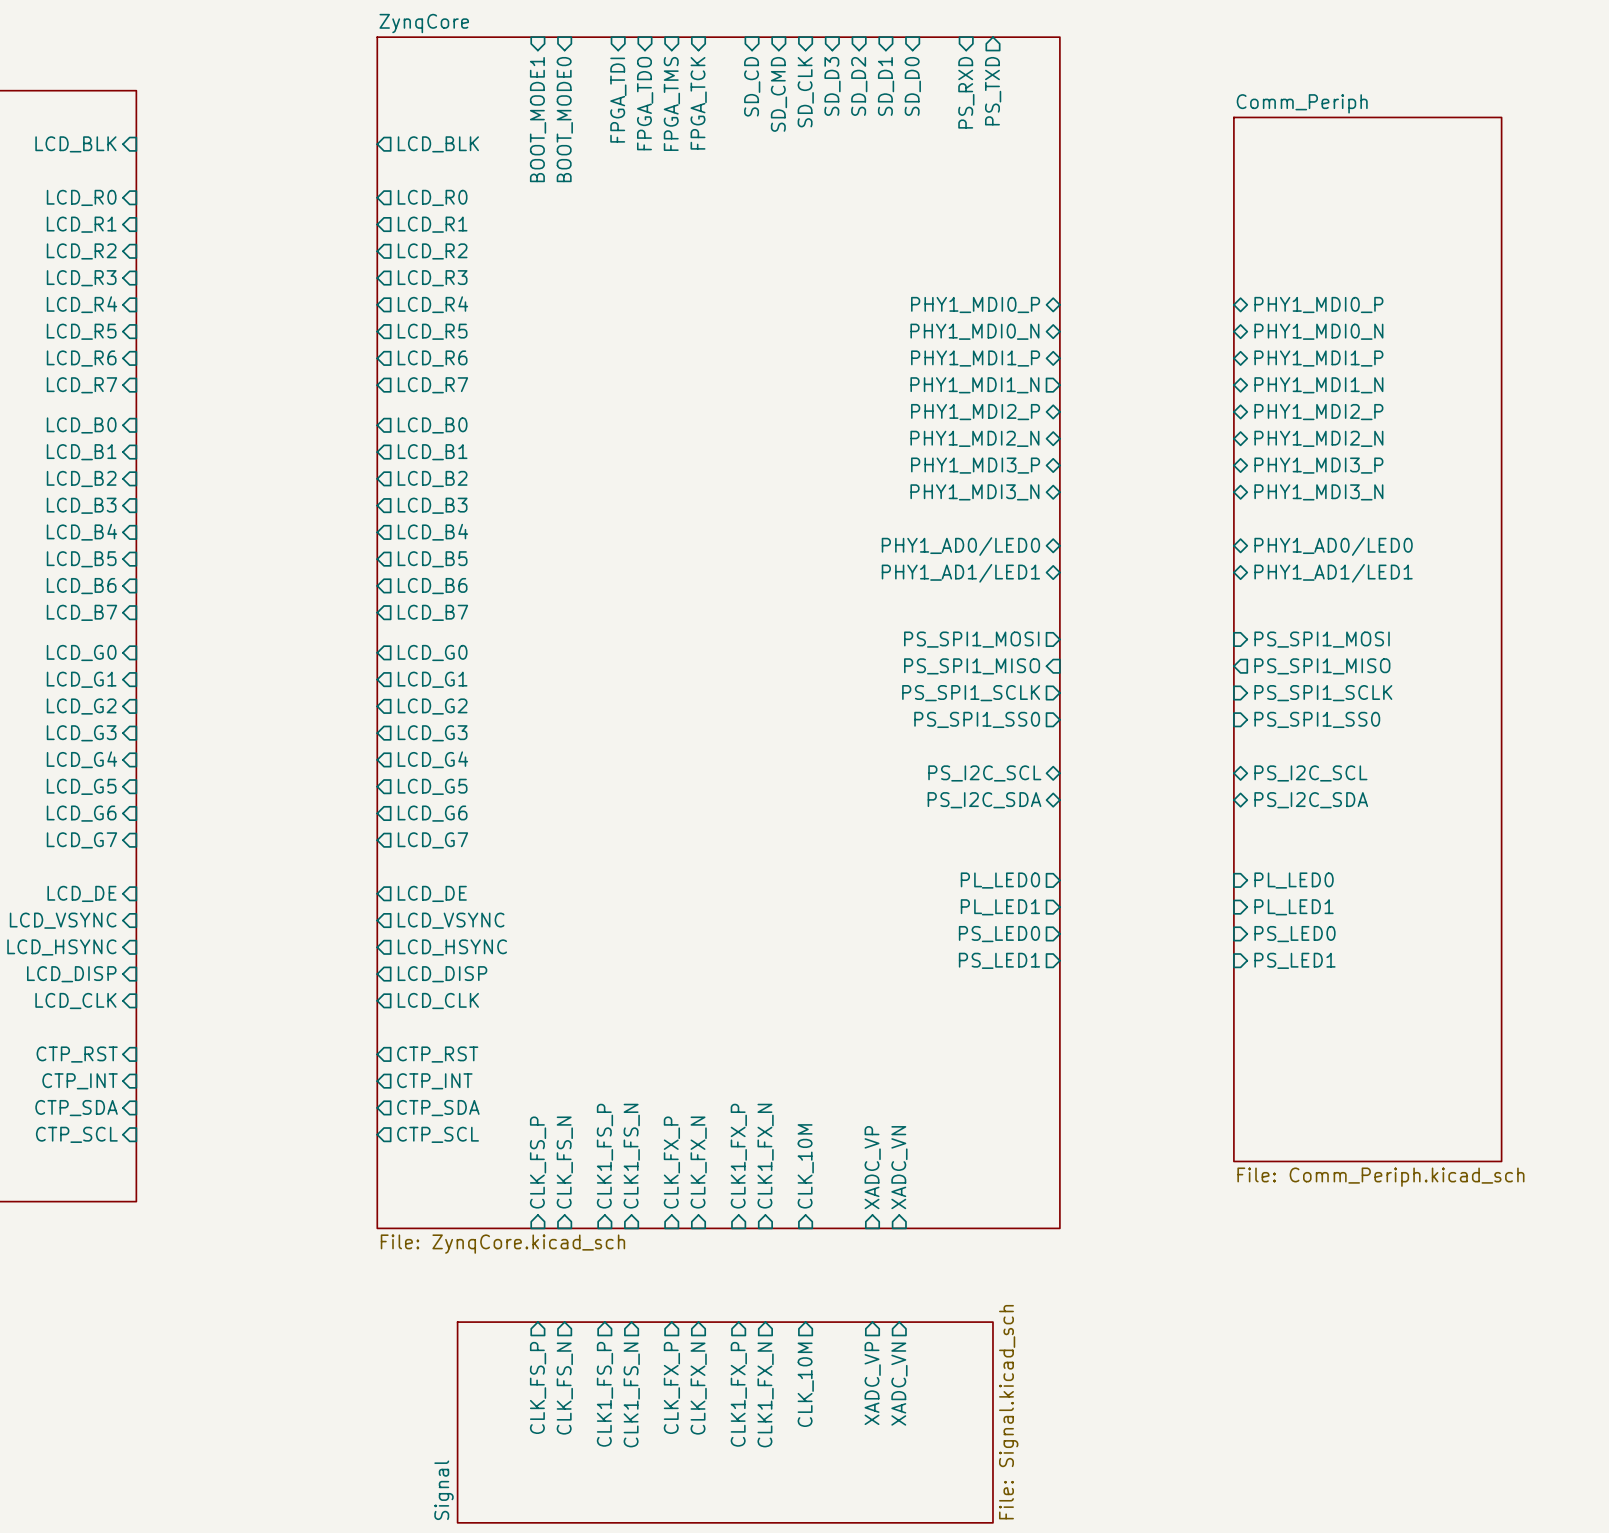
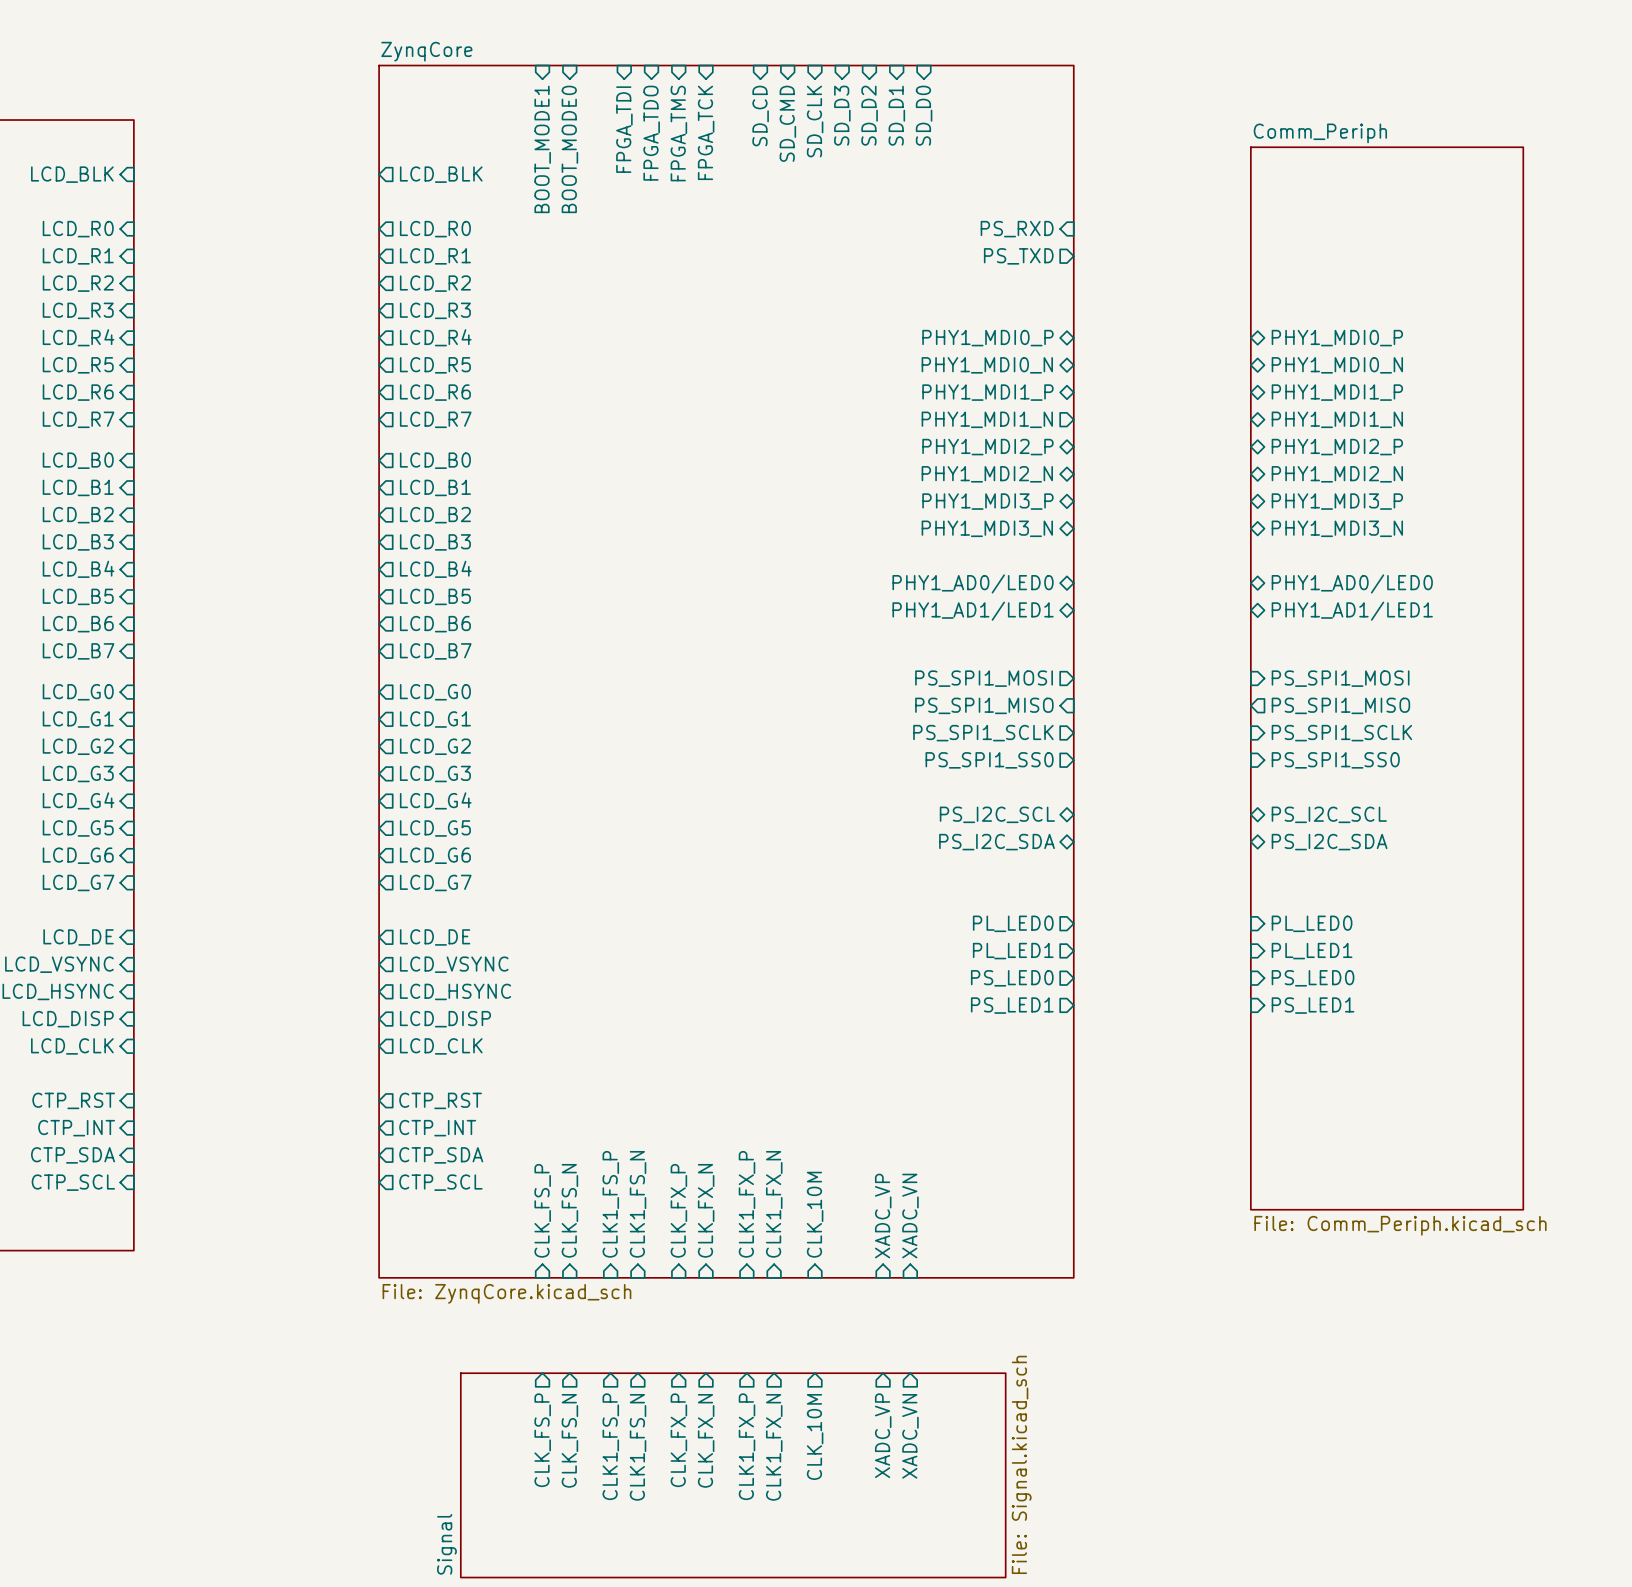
sheet pin rotation: 0° (993, 91) -> 90° clockwise (1018, 256)
sheet pin position: PS_TXD (993, 91) -> PS_TXD (1018, 256)
sheet pin rotation: 0° (966, 92) -> 90° clockwise (1017, 229)
sheet pin position: PS_RXD (966, 92) -> PS_RXD (1017, 229)

